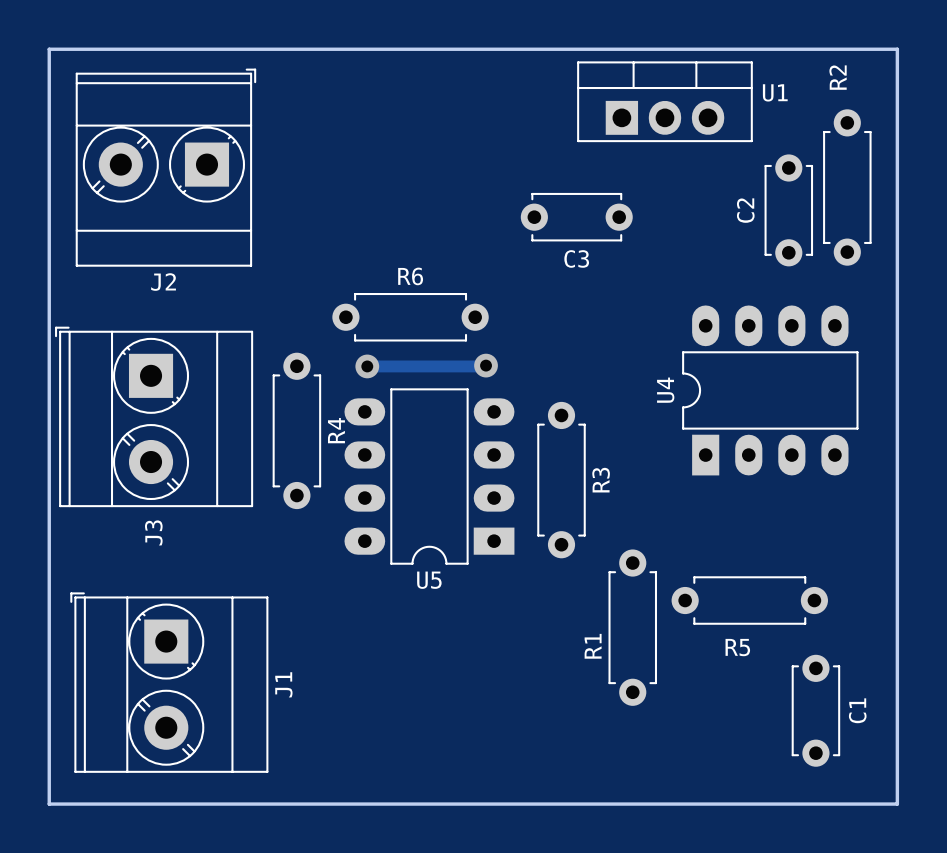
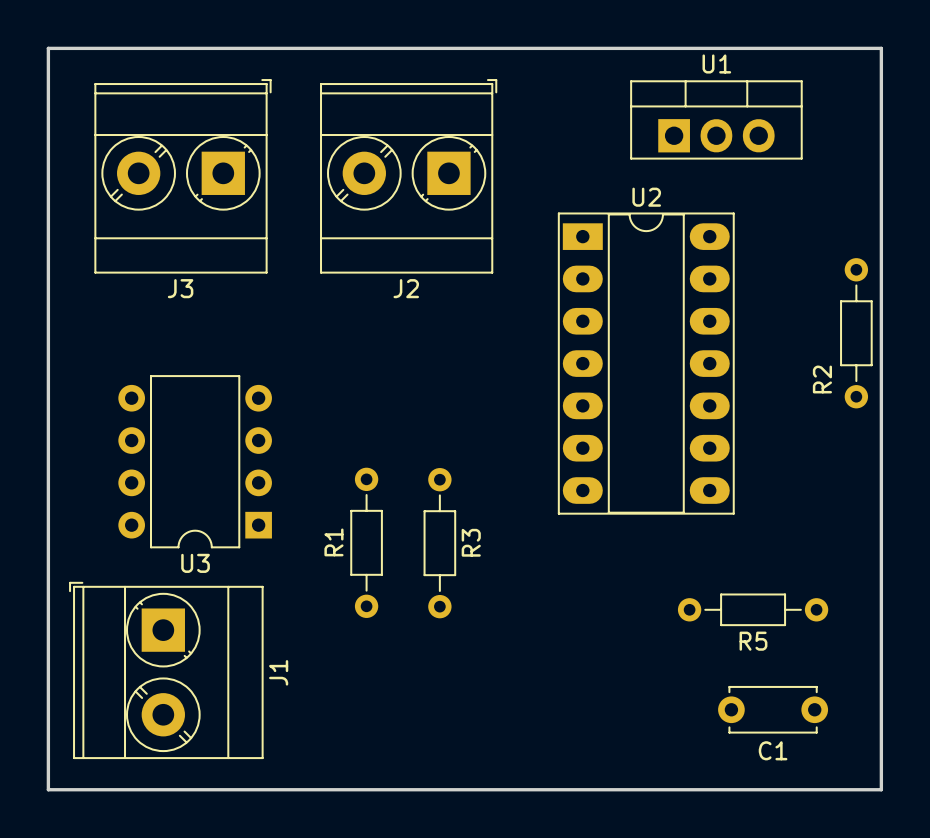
R2 name position: R2 (838, 77) -> R2 (822, 379)
U1 name position: U1 (775, 92) -> U1 (716, 64)
U1 position: (664, 101) -> (716, 119)
R2 footprint: [823, 109, 872, 266] -> [840, 258, 873, 409]
J2 position: (165, 167) -> (408, 176)
C2: (788, 210) -> none
C3: (576, 217) -> none
R6: (410, 317) -> none
track: (486, 365) (367, 366) -> none
via: (486, 365) -> none
via: (367, 366) -> none
U2: none -> (646, 363)
U4: (770, 390) -> none
R3 footprint: [537, 401, 586, 559] -> [423, 468, 457, 619]
J3 rotation: 0° (154, 416) -> 90° clockwise (182, 176)
J3 position: (154, 416) -> (182, 176)
R4: (296, 430) -> none
U3: none -> (195, 461)
U5: (429, 476) -> none
R1 footprint: [608, 549, 658, 706] -> [350, 467, 383, 618]
R5 footprint: [671, 576, 828, 625] -> [677, 593, 829, 627]
C1 rotation: 0° (815, 710) -> 90° clockwise (773, 709)

